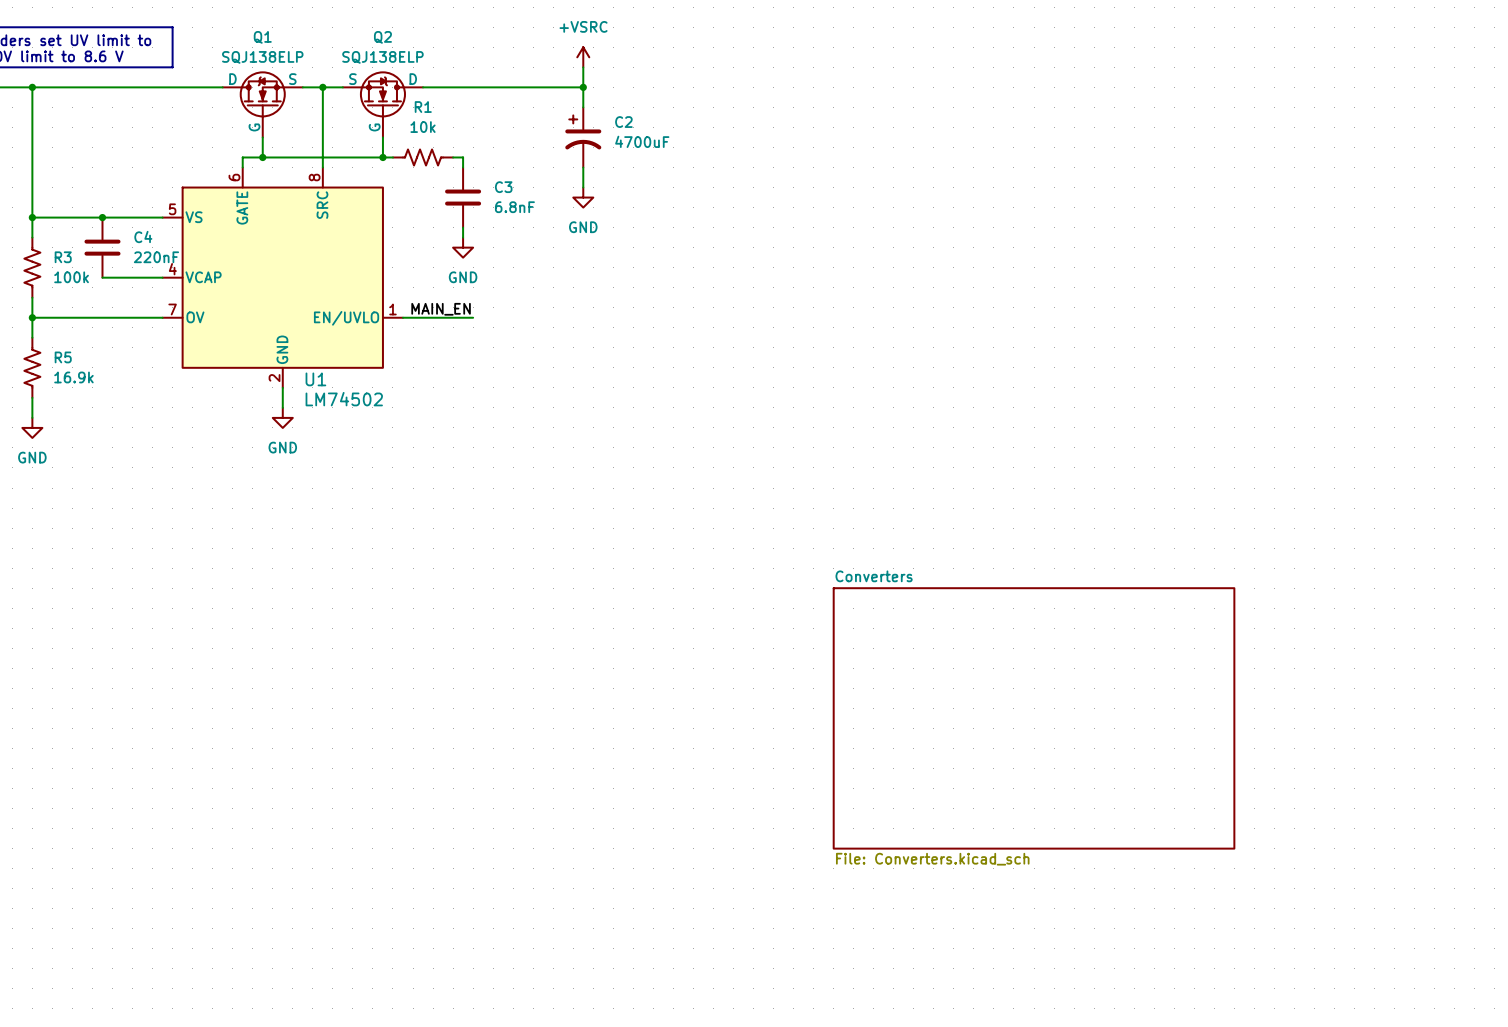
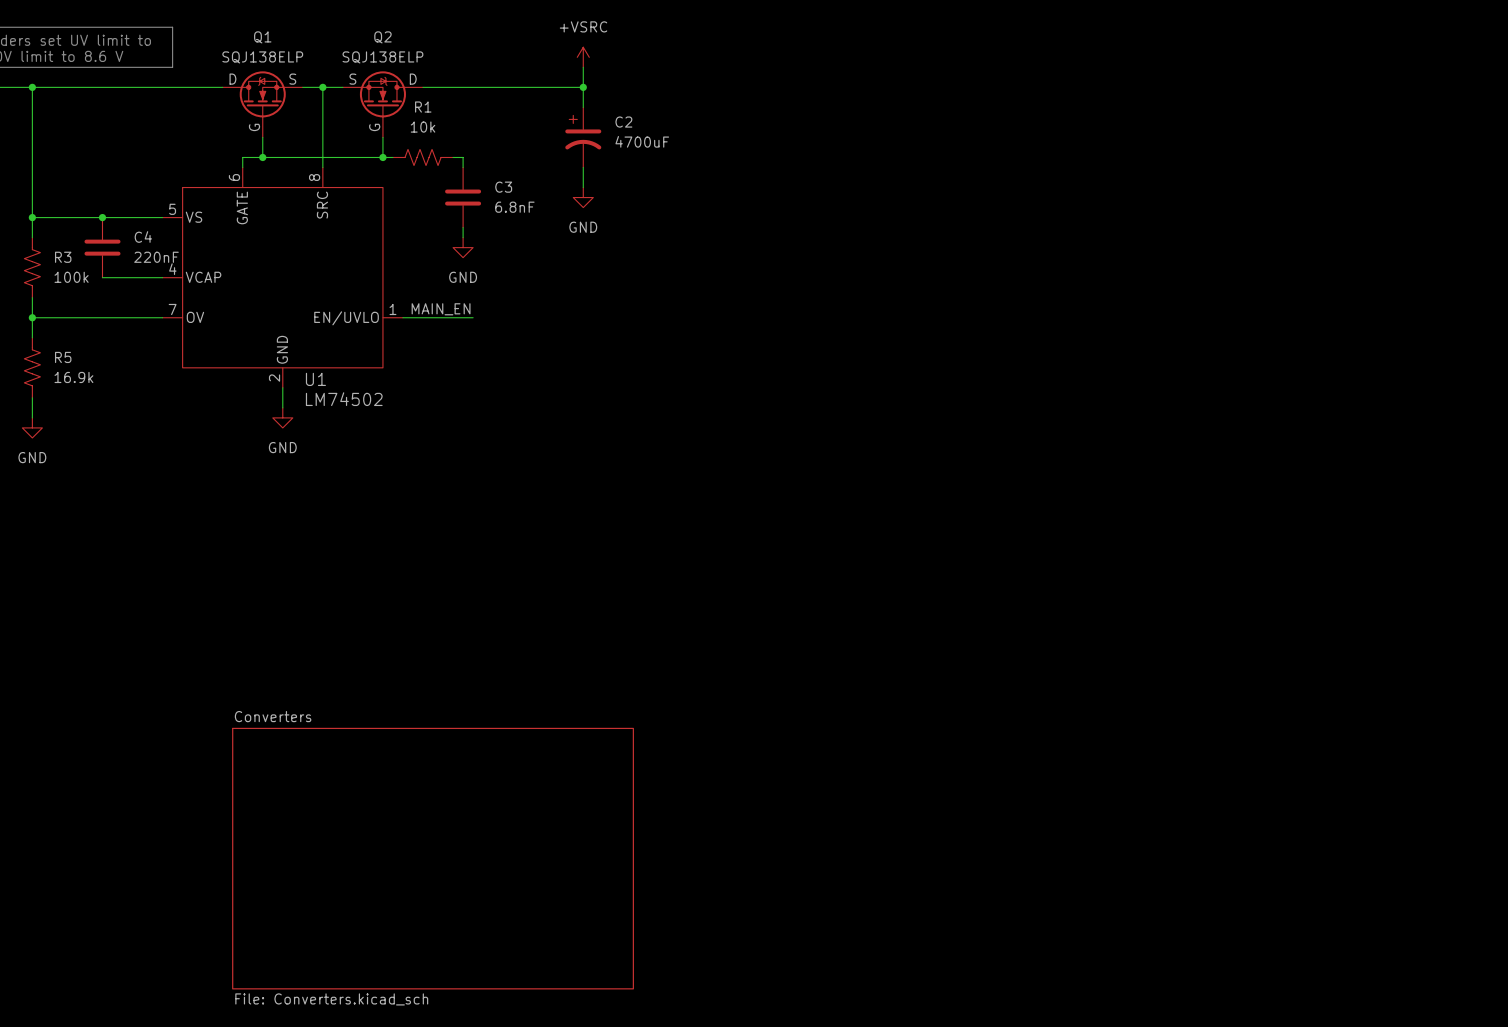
sheet Converters: File: Converters.kicad_sch (1034, 718) -> none
sheet Converters: none -> File: Converters.kicad_sch (433, 858)

